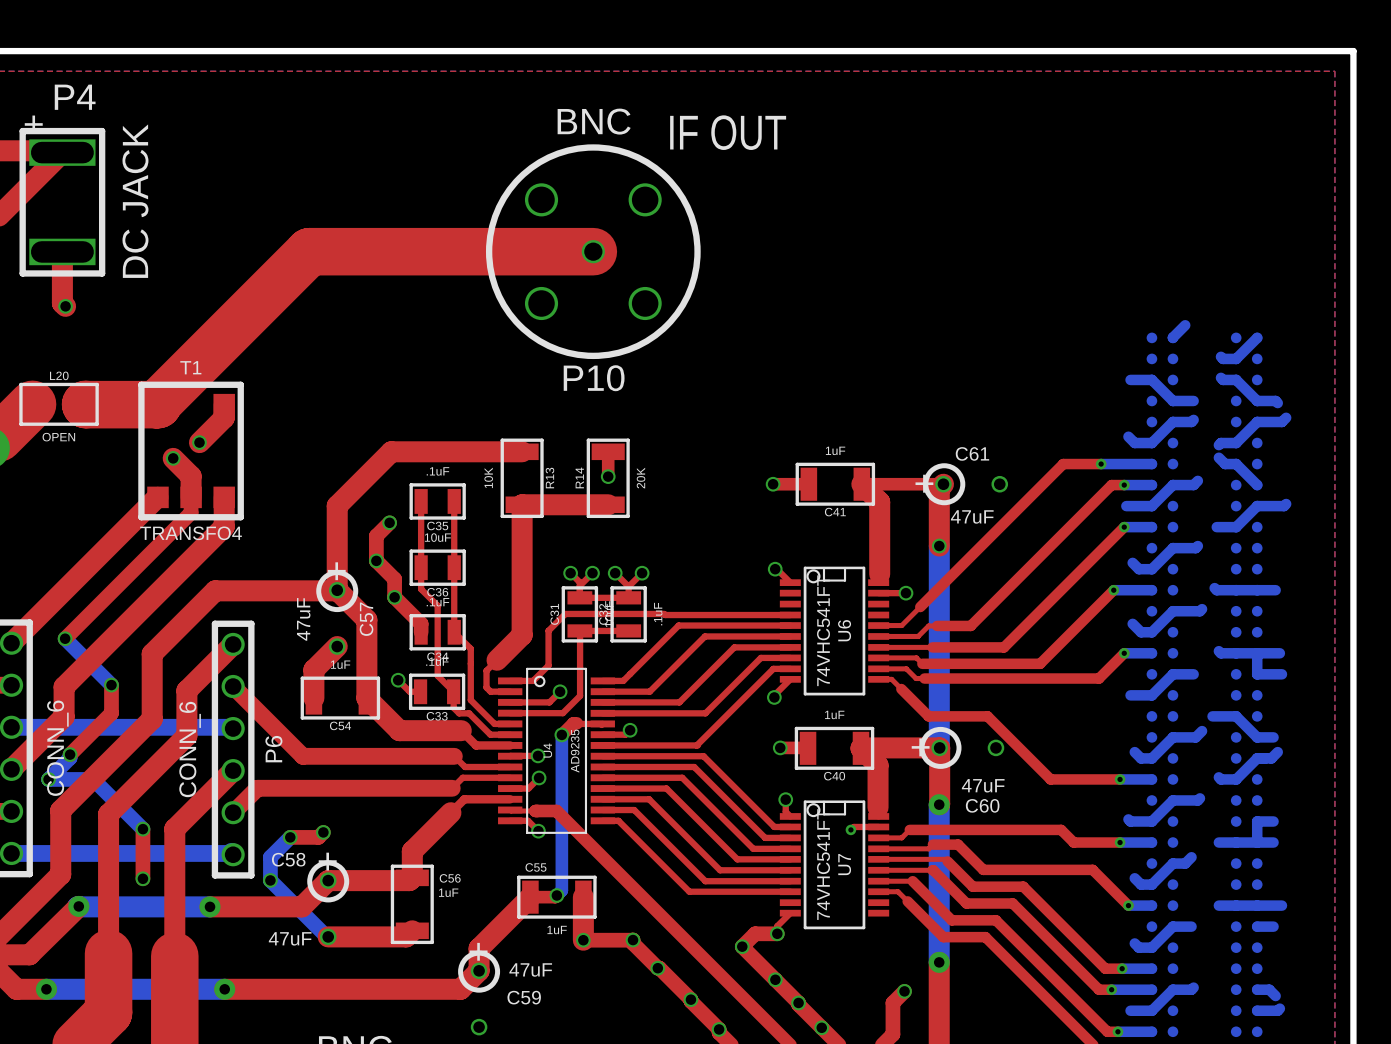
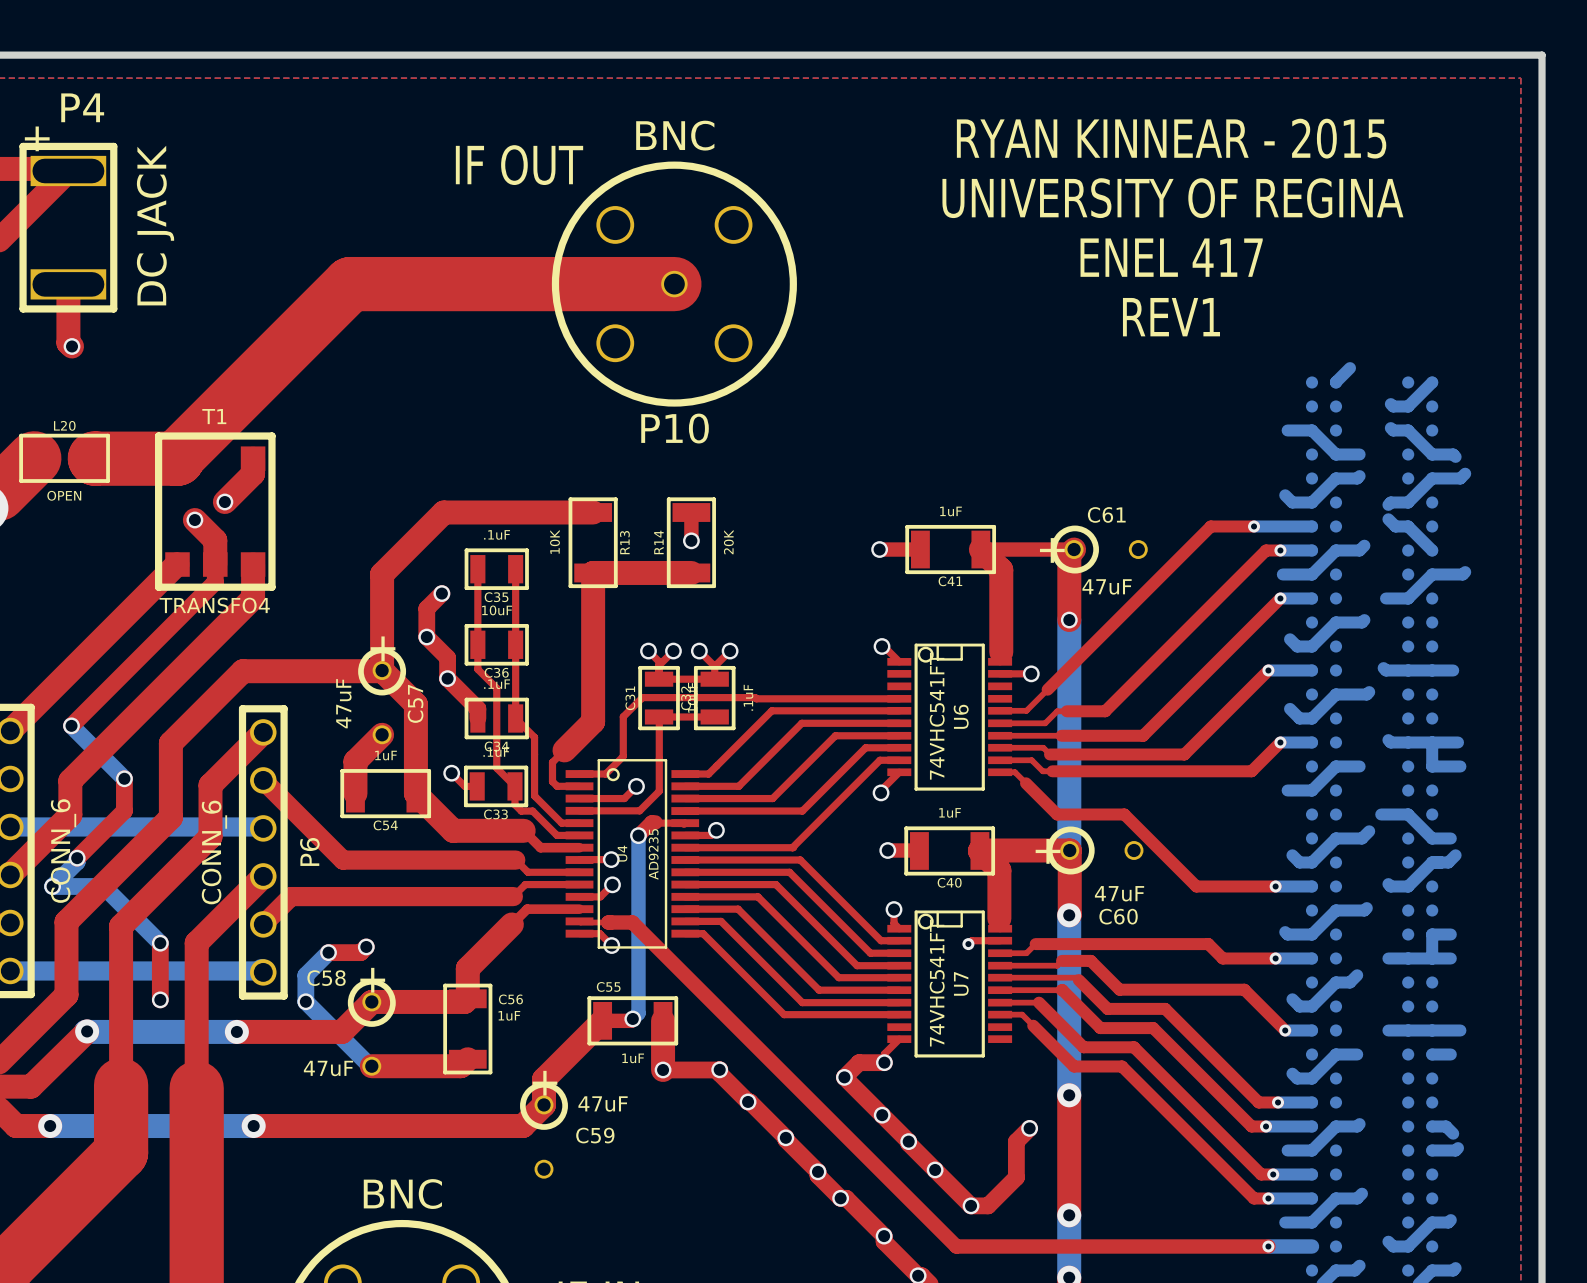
text: none -> RYAN KINNEAR - 2015 (1171, 138)
text position: IF OUT (728, 132) -> IF OUT (519, 165)
text: none -> UNIVERSITY OF REGINA (1172, 198)
text: none -> ENEL 417 (1171, 257)
text: none -> REV1 (1171, 317)

